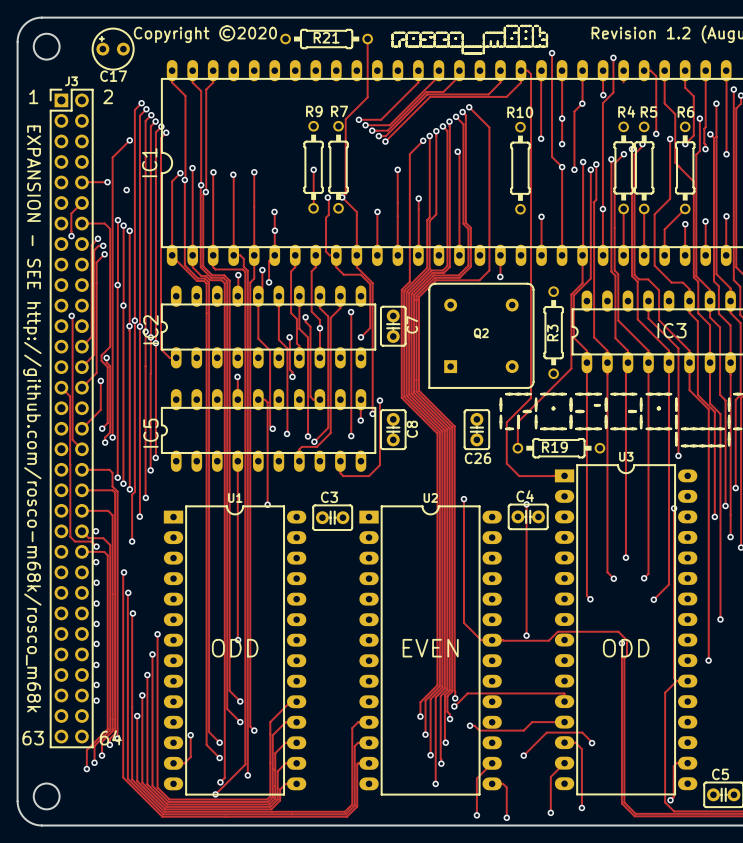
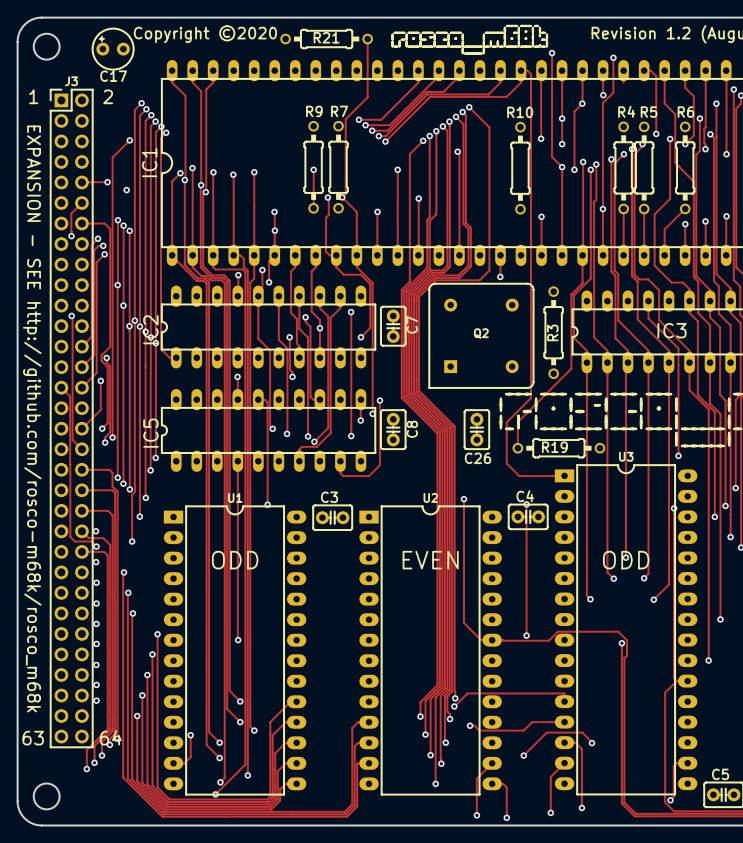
text position: ODD (235, 648) -> ODD (235, 560)
text position: EVEN (430, 648) -> EVEN (430, 560)
text position: ODD (626, 648) -> ODD (626, 560)

